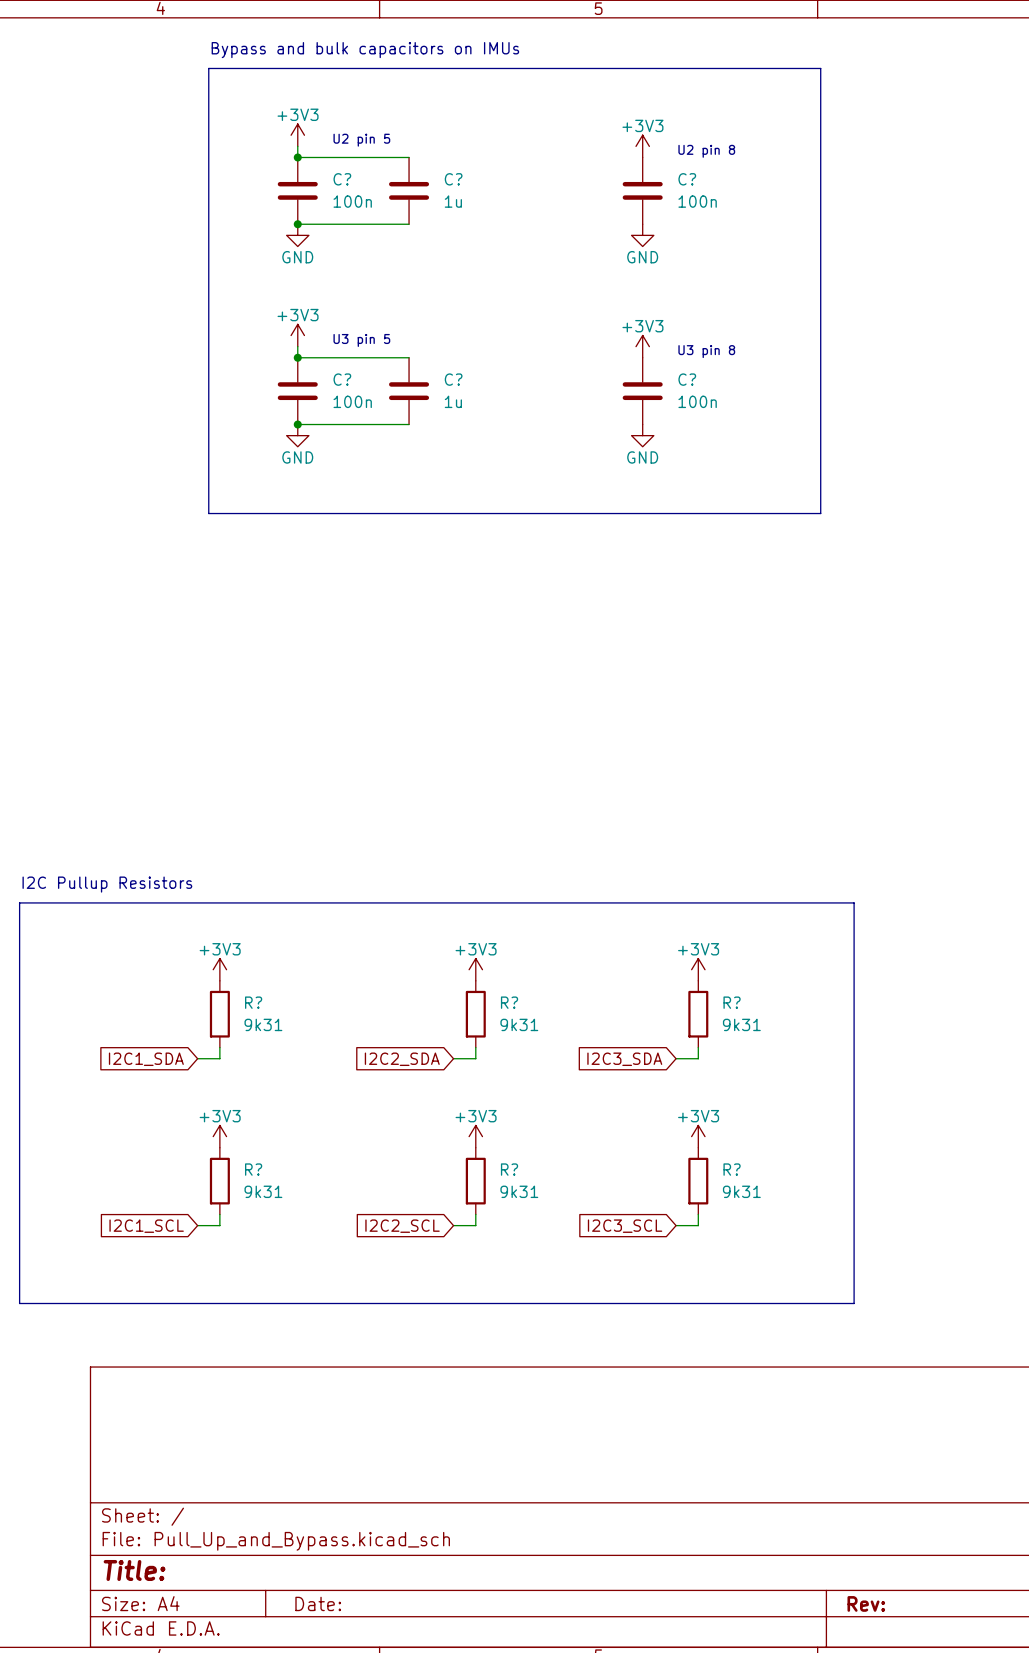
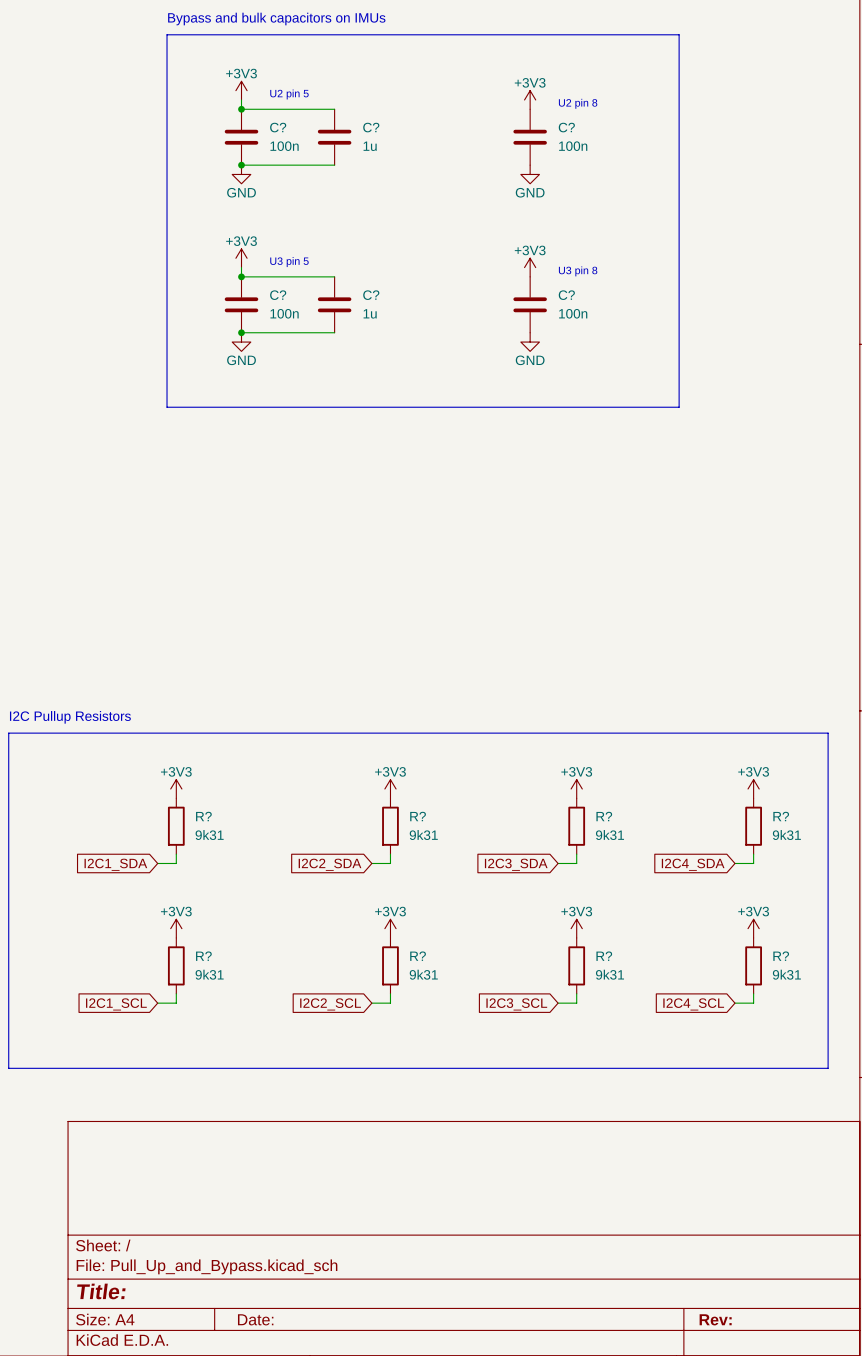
line: (854, 902) (854, 1303) -> (707, 733) (828, 733) (828, 1068) (707, 1068)
power symbol: none -> +3V3 (753, 788)
R?: none -> 9k31 (753, 826)
wire: none -> (753, 854) (753, 863) (734, 863)
global label: none -> I2C4_SDA (693, 864)
power symbol: none -> +3V3 (753, 928)
R?: none -> 9k31 (753, 965)
wire: none -> (753, 993) (753, 1003) (734, 1003)
global label: none -> I2C4_SCL (693, 1004)

